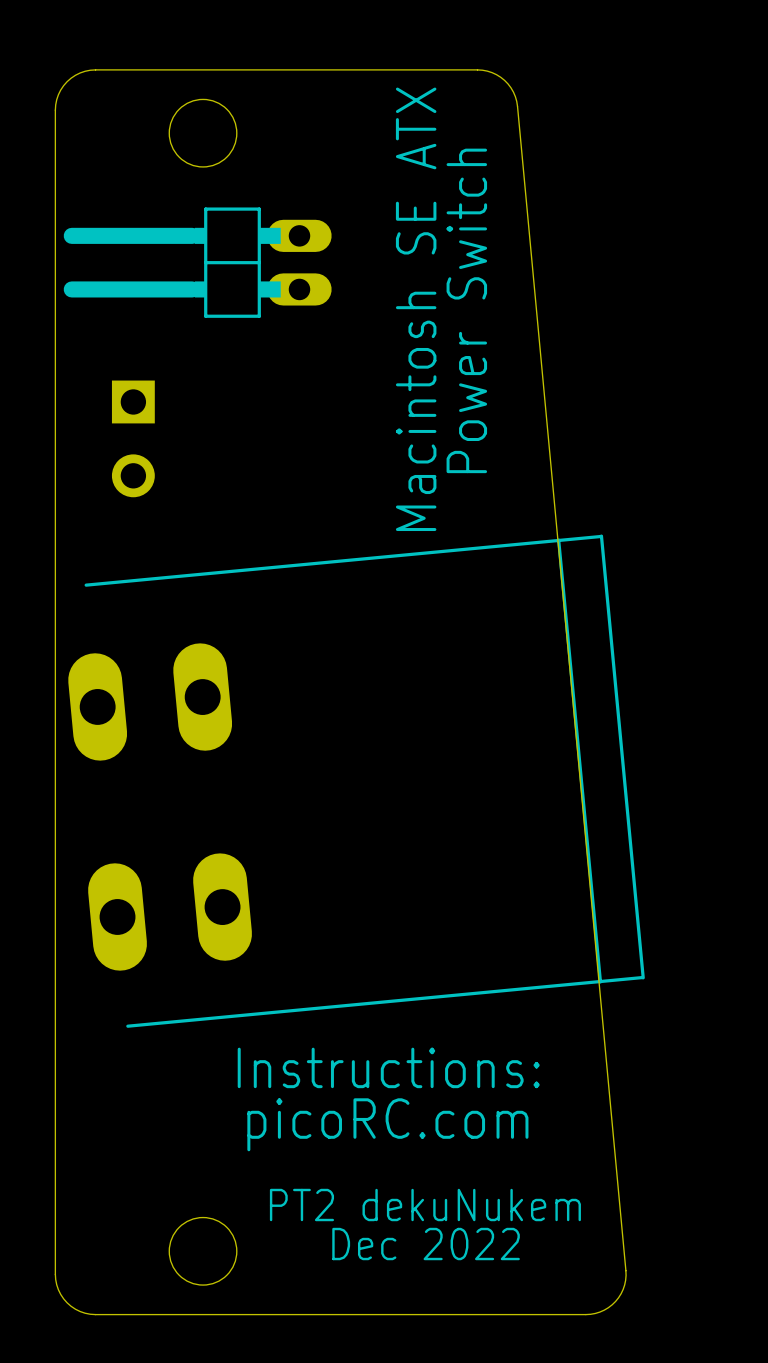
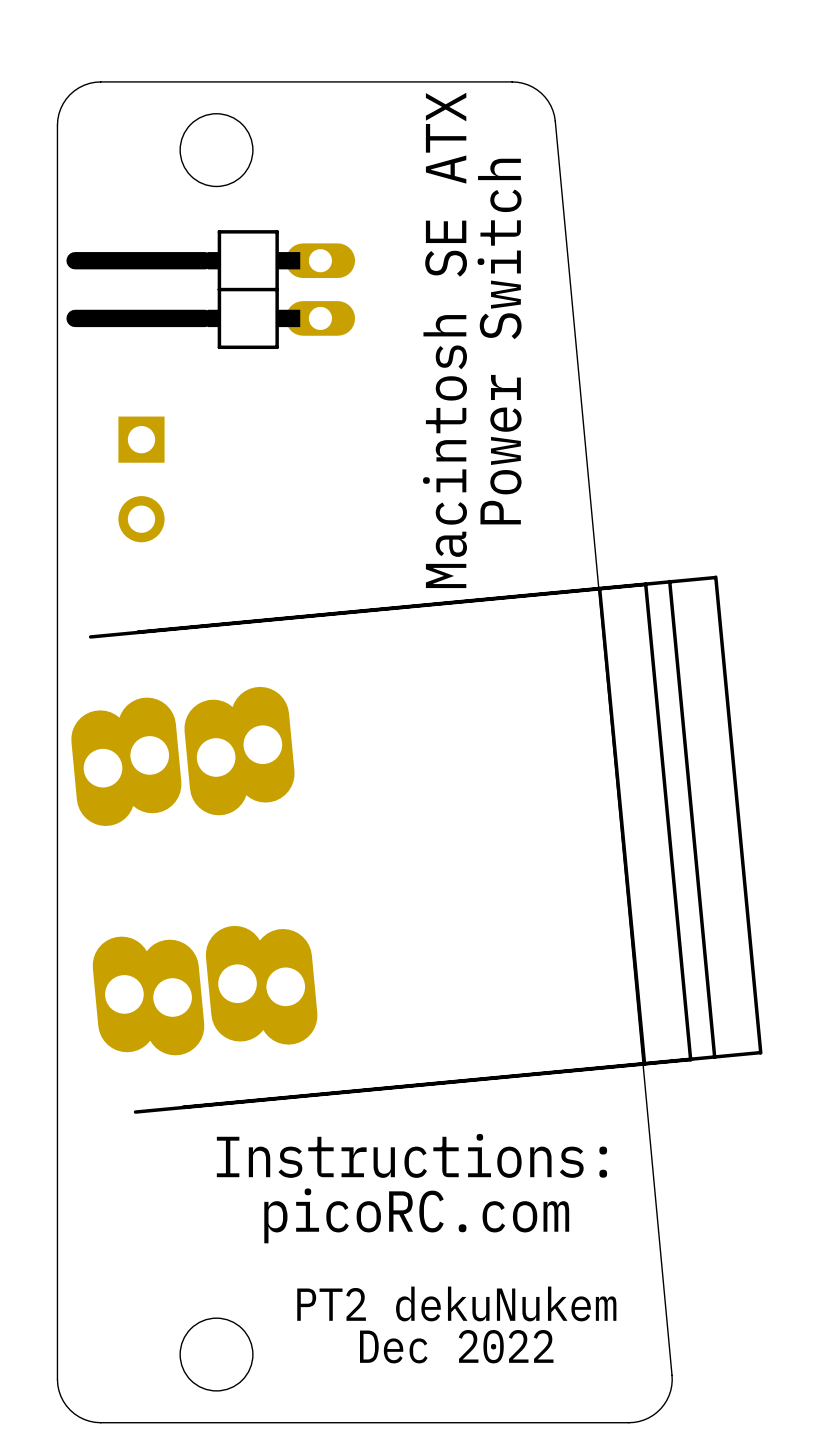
part: none -> (440, 842)

